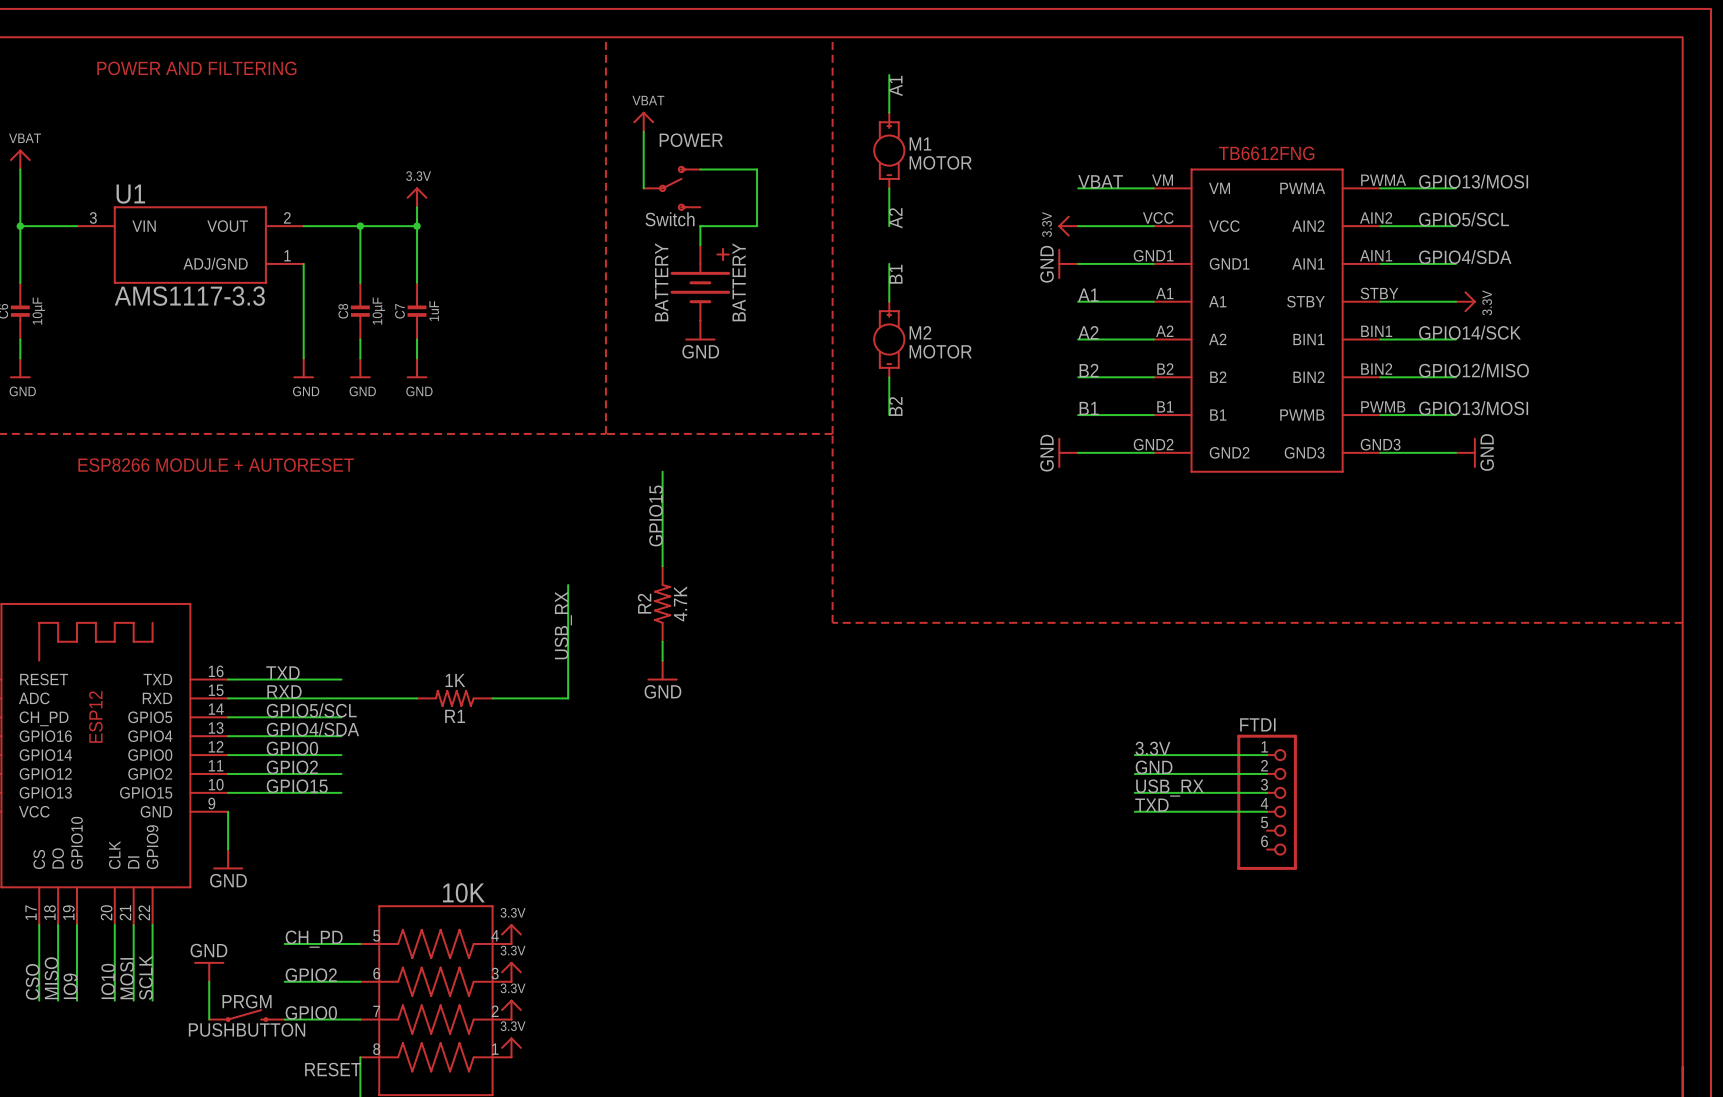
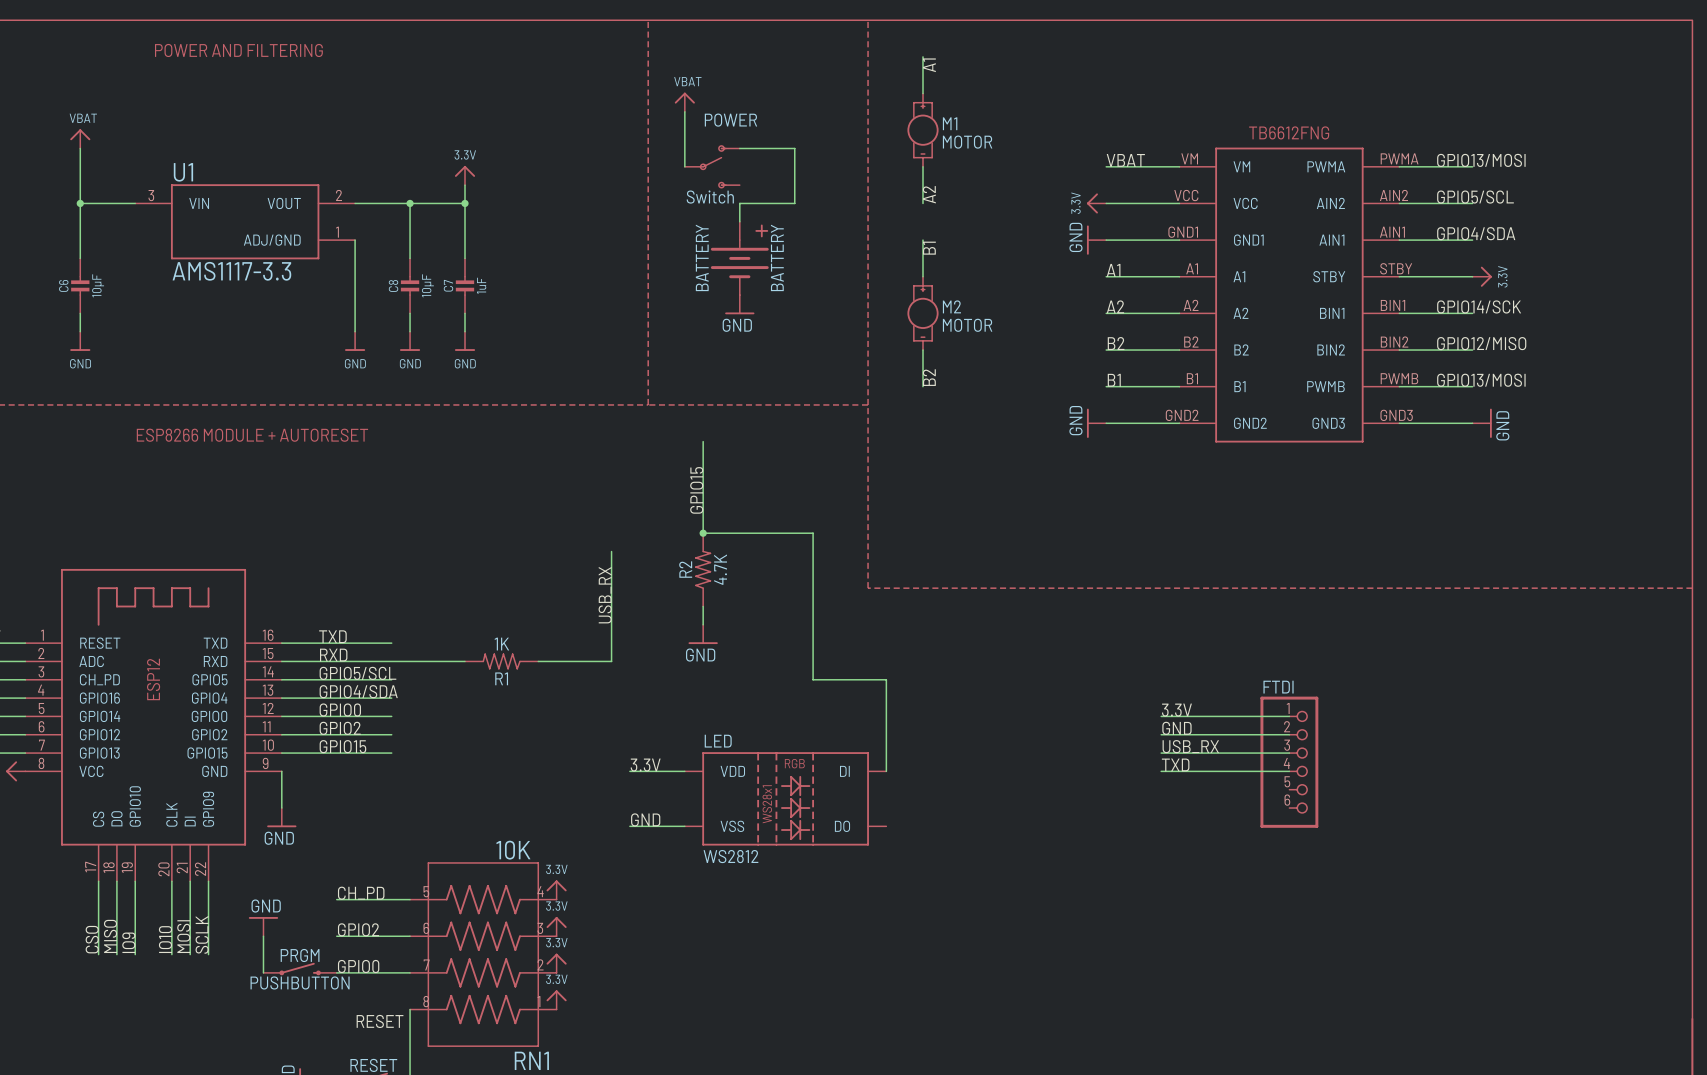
wire: none -> (703, 533) (813, 533) (813, 679) (886, 679) (886, 771)
junction: none -> (703, 533)
label: none -> 3.3V (645, 765)
wire: none -> (629, 771) (684, 771)
LED: none -> WS2812 (785, 798)
label: none -> GND (645, 819)
wire: none -> (629, 826) (684, 826)

